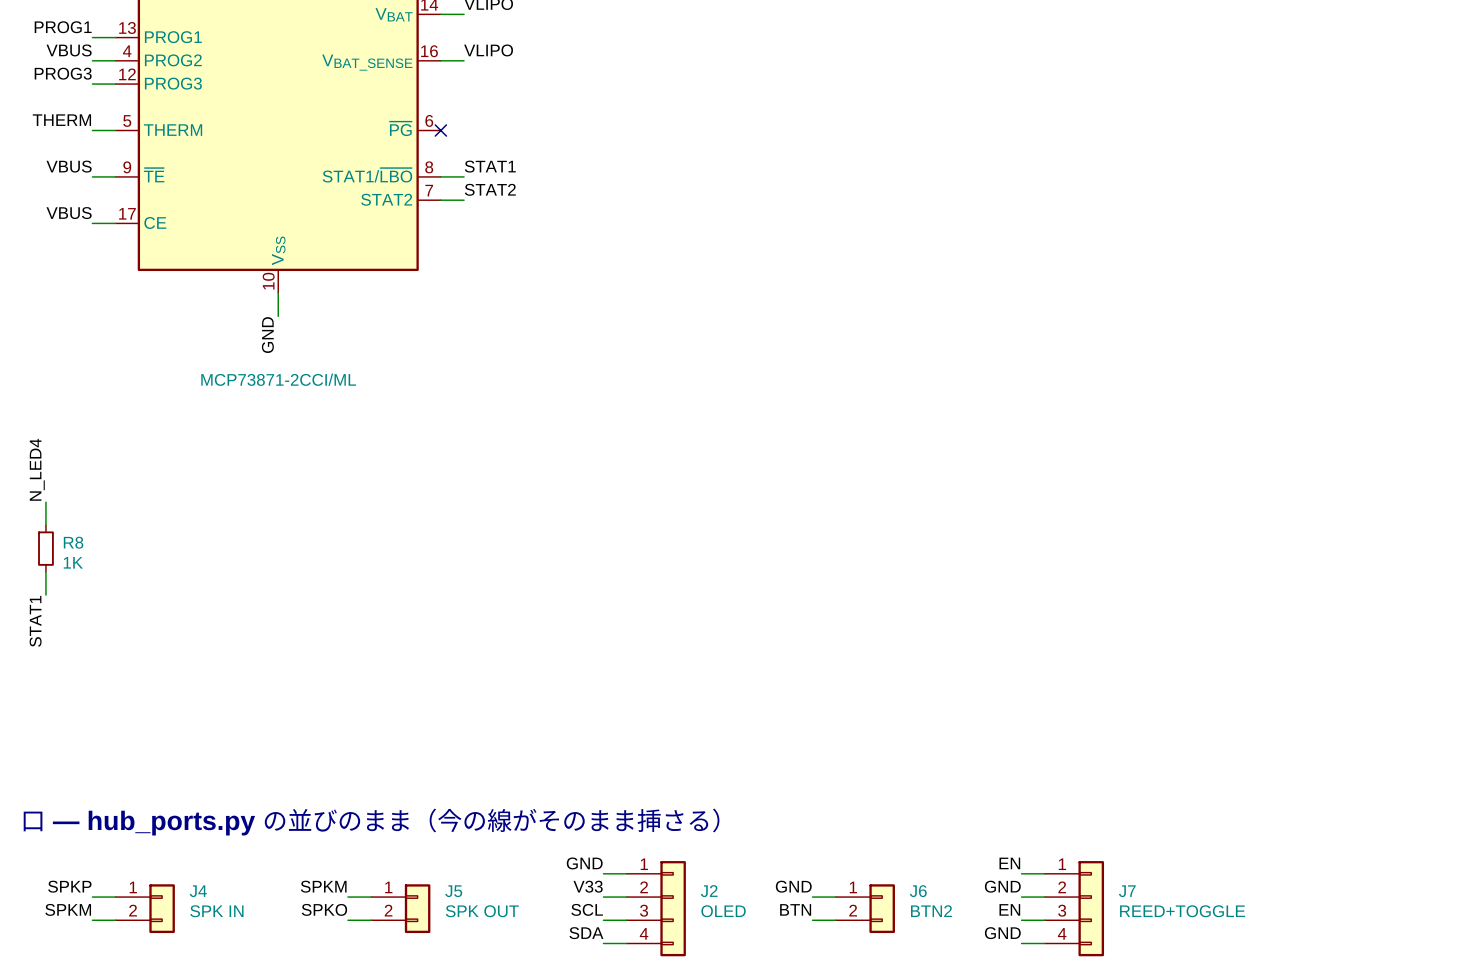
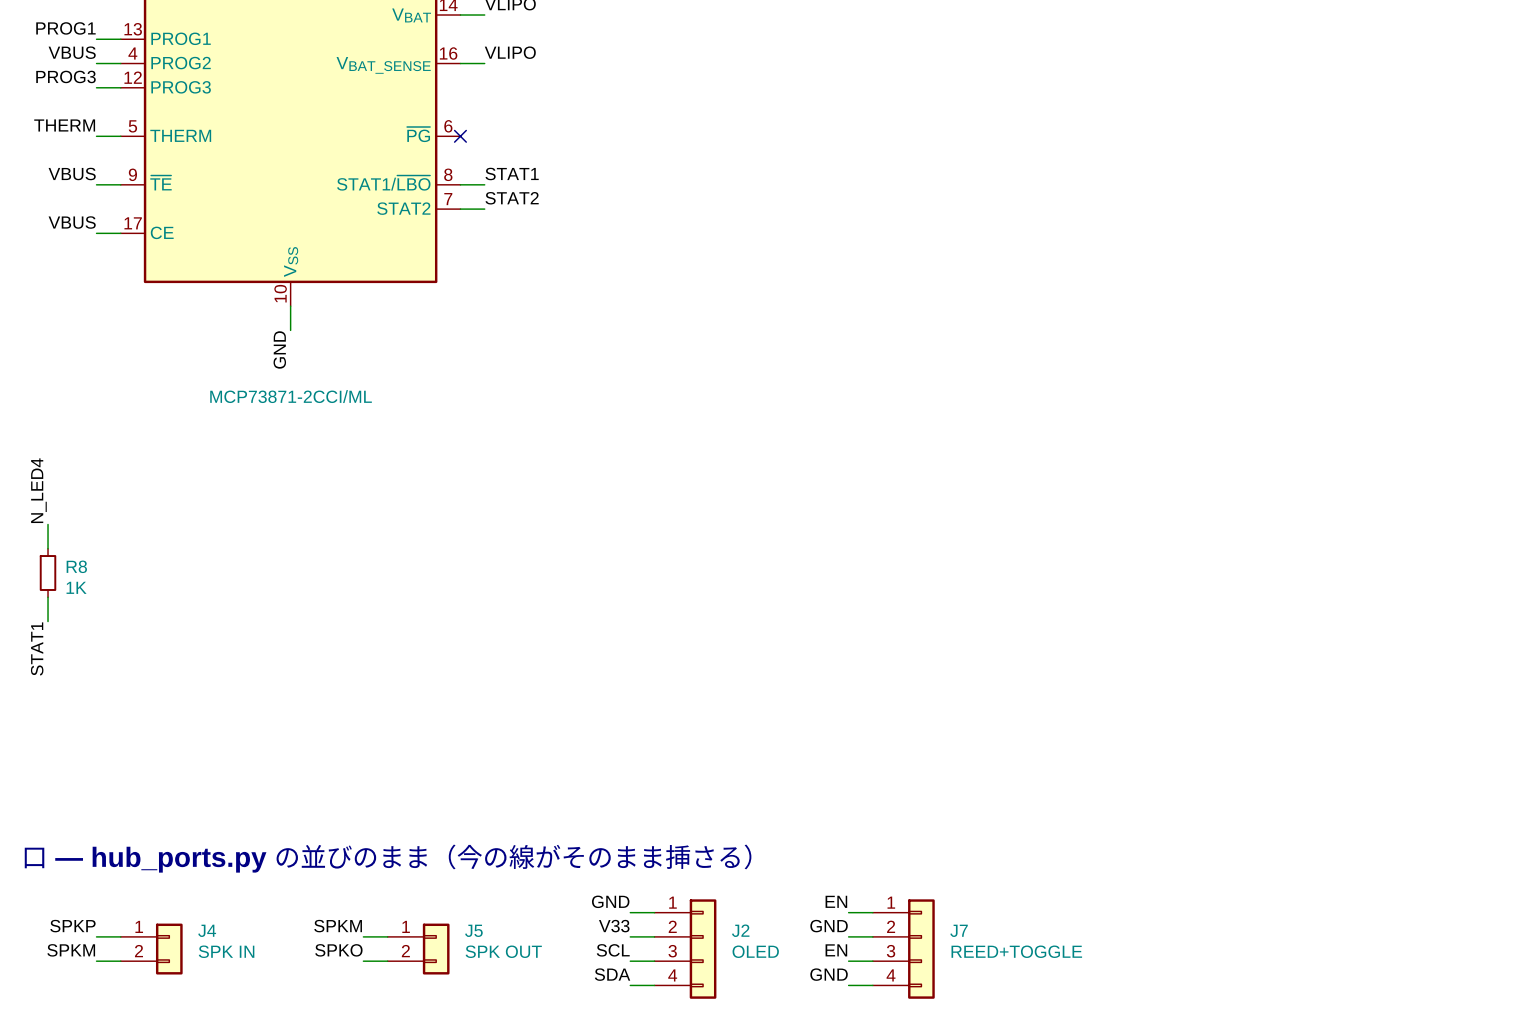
label: none -> EN (836, 901)
label: EN (1009, 863) -> none
wire: (1021, 873) (1044, 873) -> (848, 912) (872, 912)
label: GND (1002, 886) -> none
wire: (1021, 897) (1044, 897) -> none
J6: BTN2 (865, 908) -> none
J7 position: (1074, 908) -> (903, 949)
label: BTN (795, 909) -> EN (836, 950)
label: EN (1009, 909) -> none
wire: (1021, 920) (1044, 920) -> none
label: none -> GND (829, 974)
label: GND (1002, 933) -> none
wire: (1021, 943) (1044, 943) -> (848, 985) (872, 985)

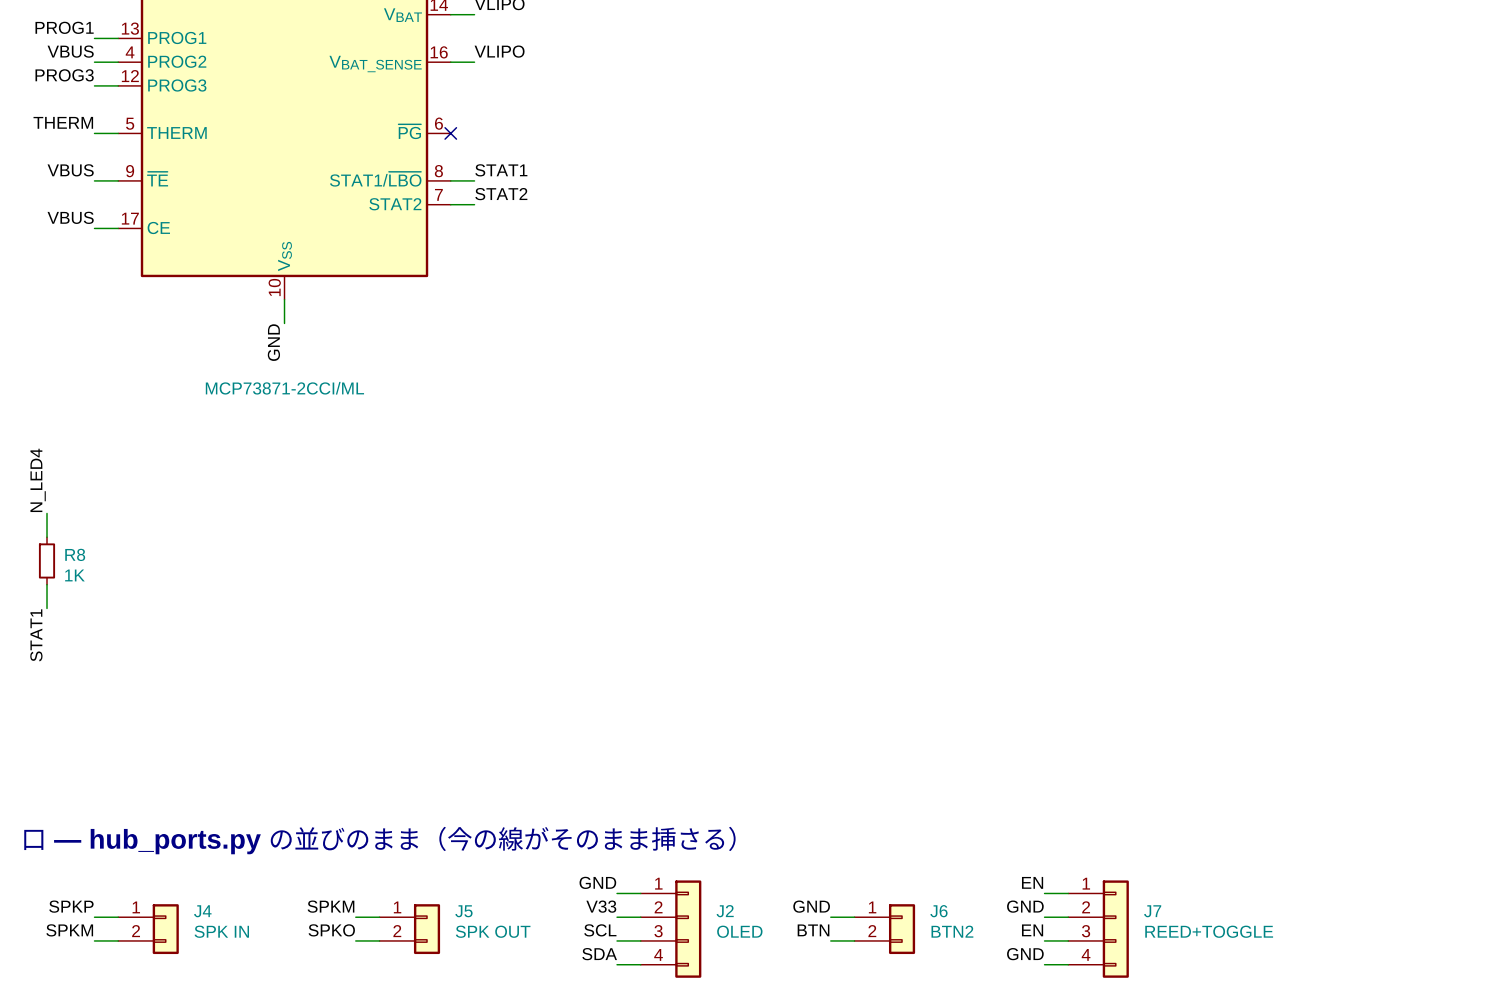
label: EN (836, 901) -> none
label: none -> EN (1032, 882)
wire: (848, 912) (872, 912) -> (1044, 893) (1068, 893)
label: none -> GND (1025, 906)
wire: none -> (1044, 917) (1068, 917)
J7 position: (903, 949) -> (1098, 929)
J6: none -> BTN2 (884, 929)
label: EN (836, 950) -> BTN (813, 930)
label: none -> EN (1032, 930)
wire: none -> (1044, 940) (1068, 940)
label: GND (829, 974) -> none
label: none -> GND (1025, 954)
wire: (848, 985) (872, 985) -> (1044, 964) (1068, 964)

